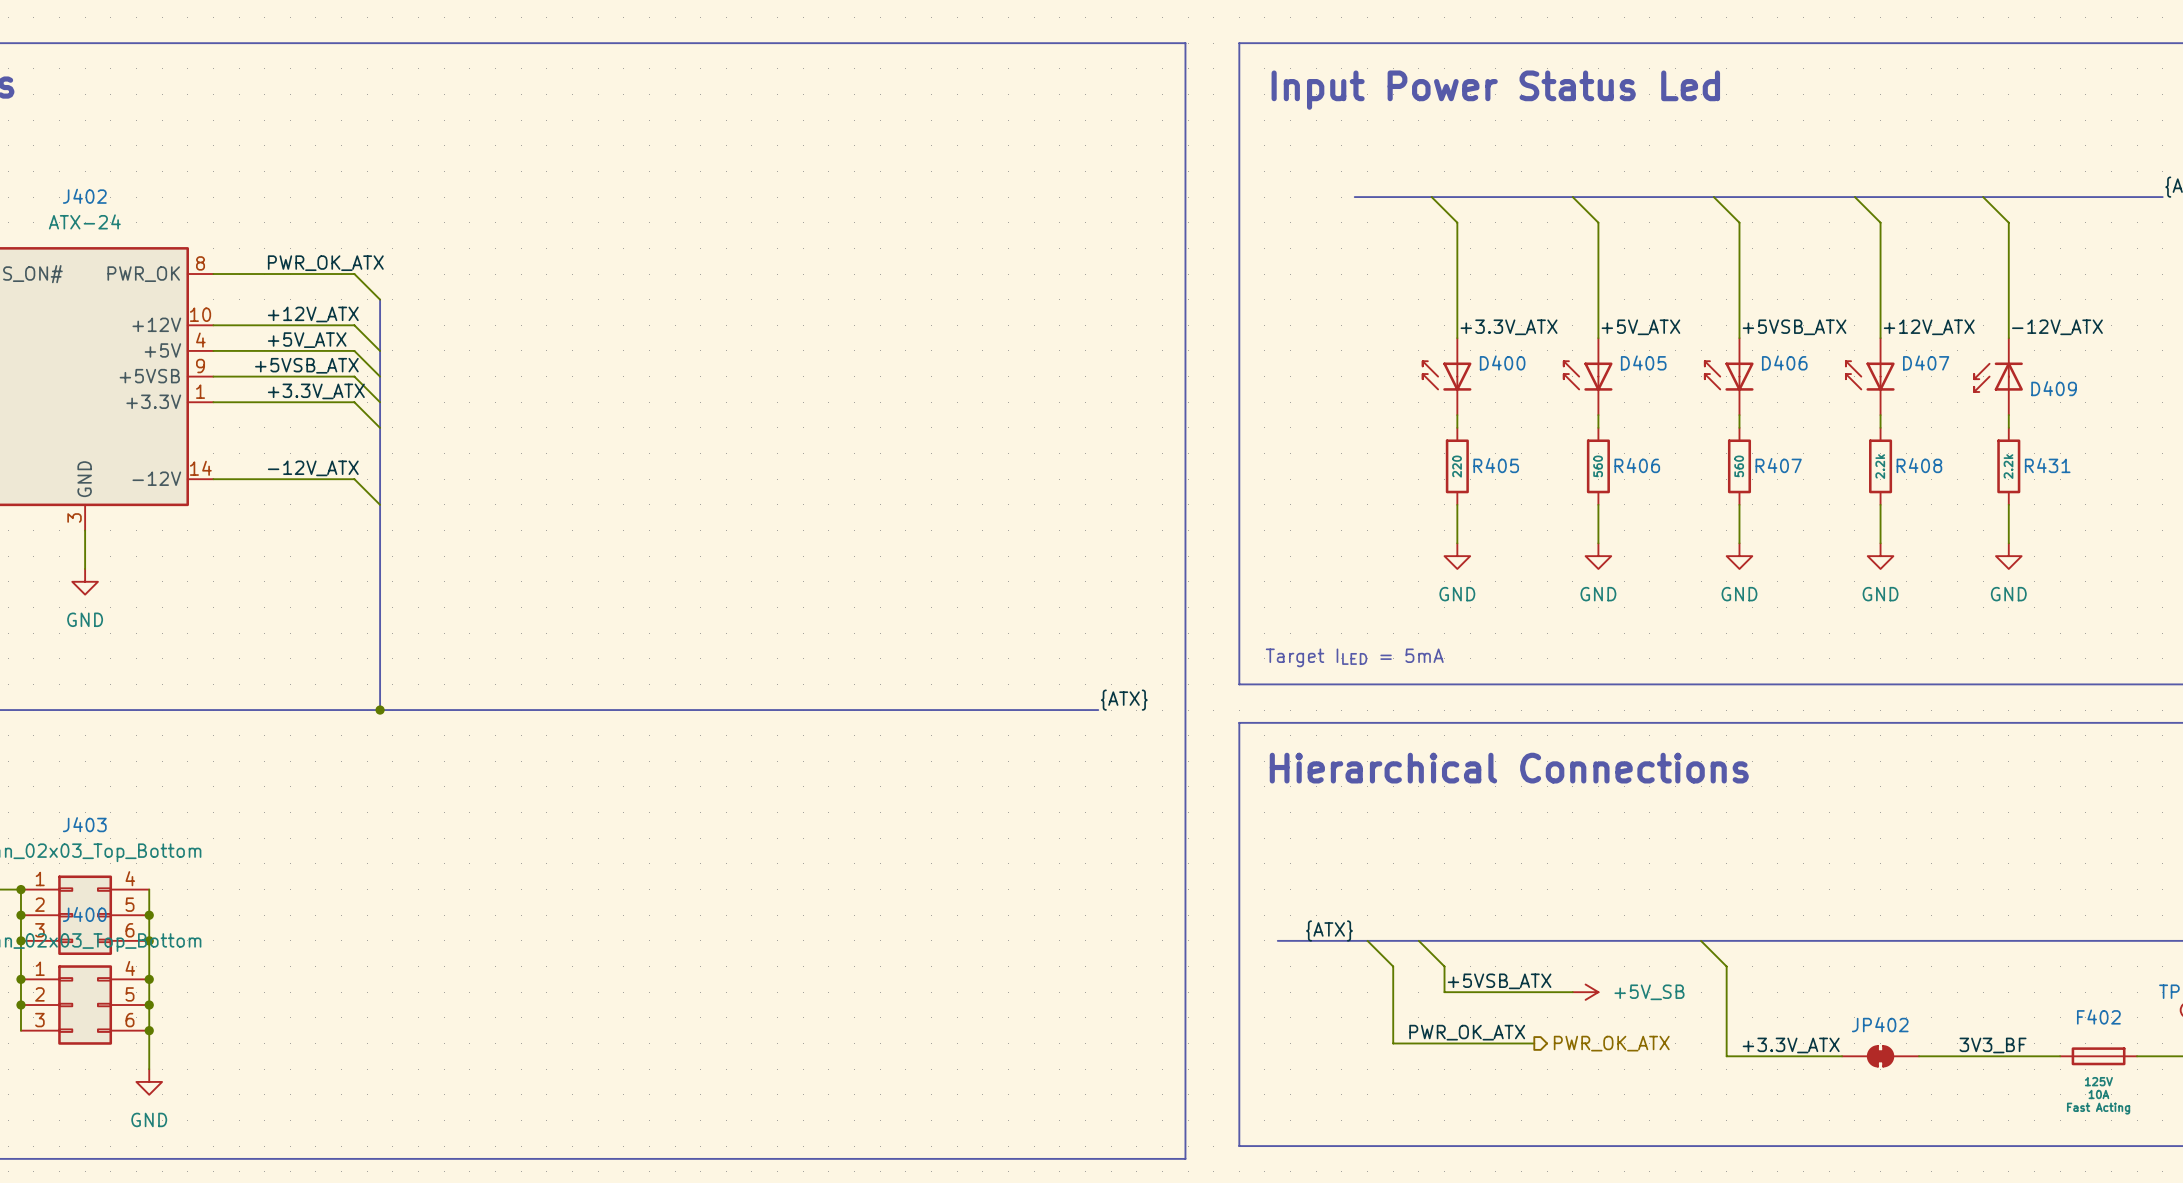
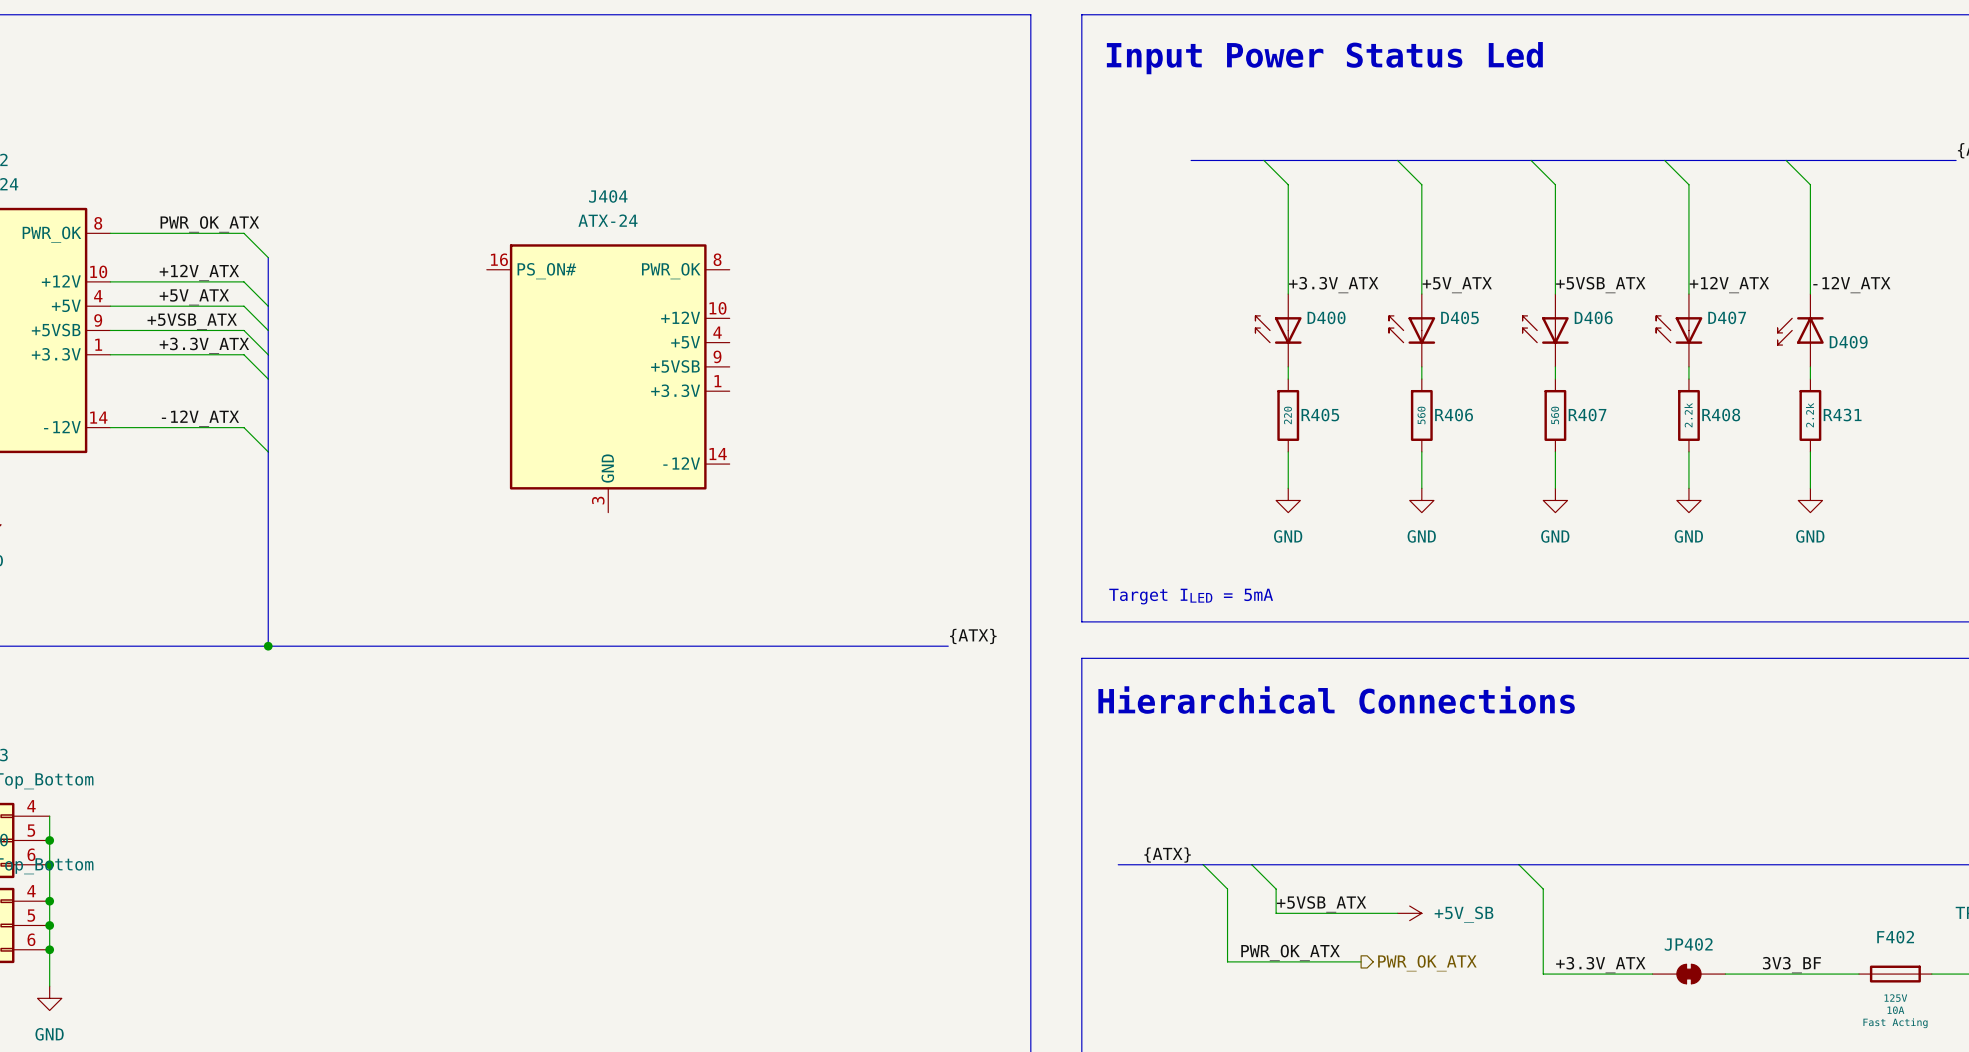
J404: none -> ATX-24 (608, 378)

